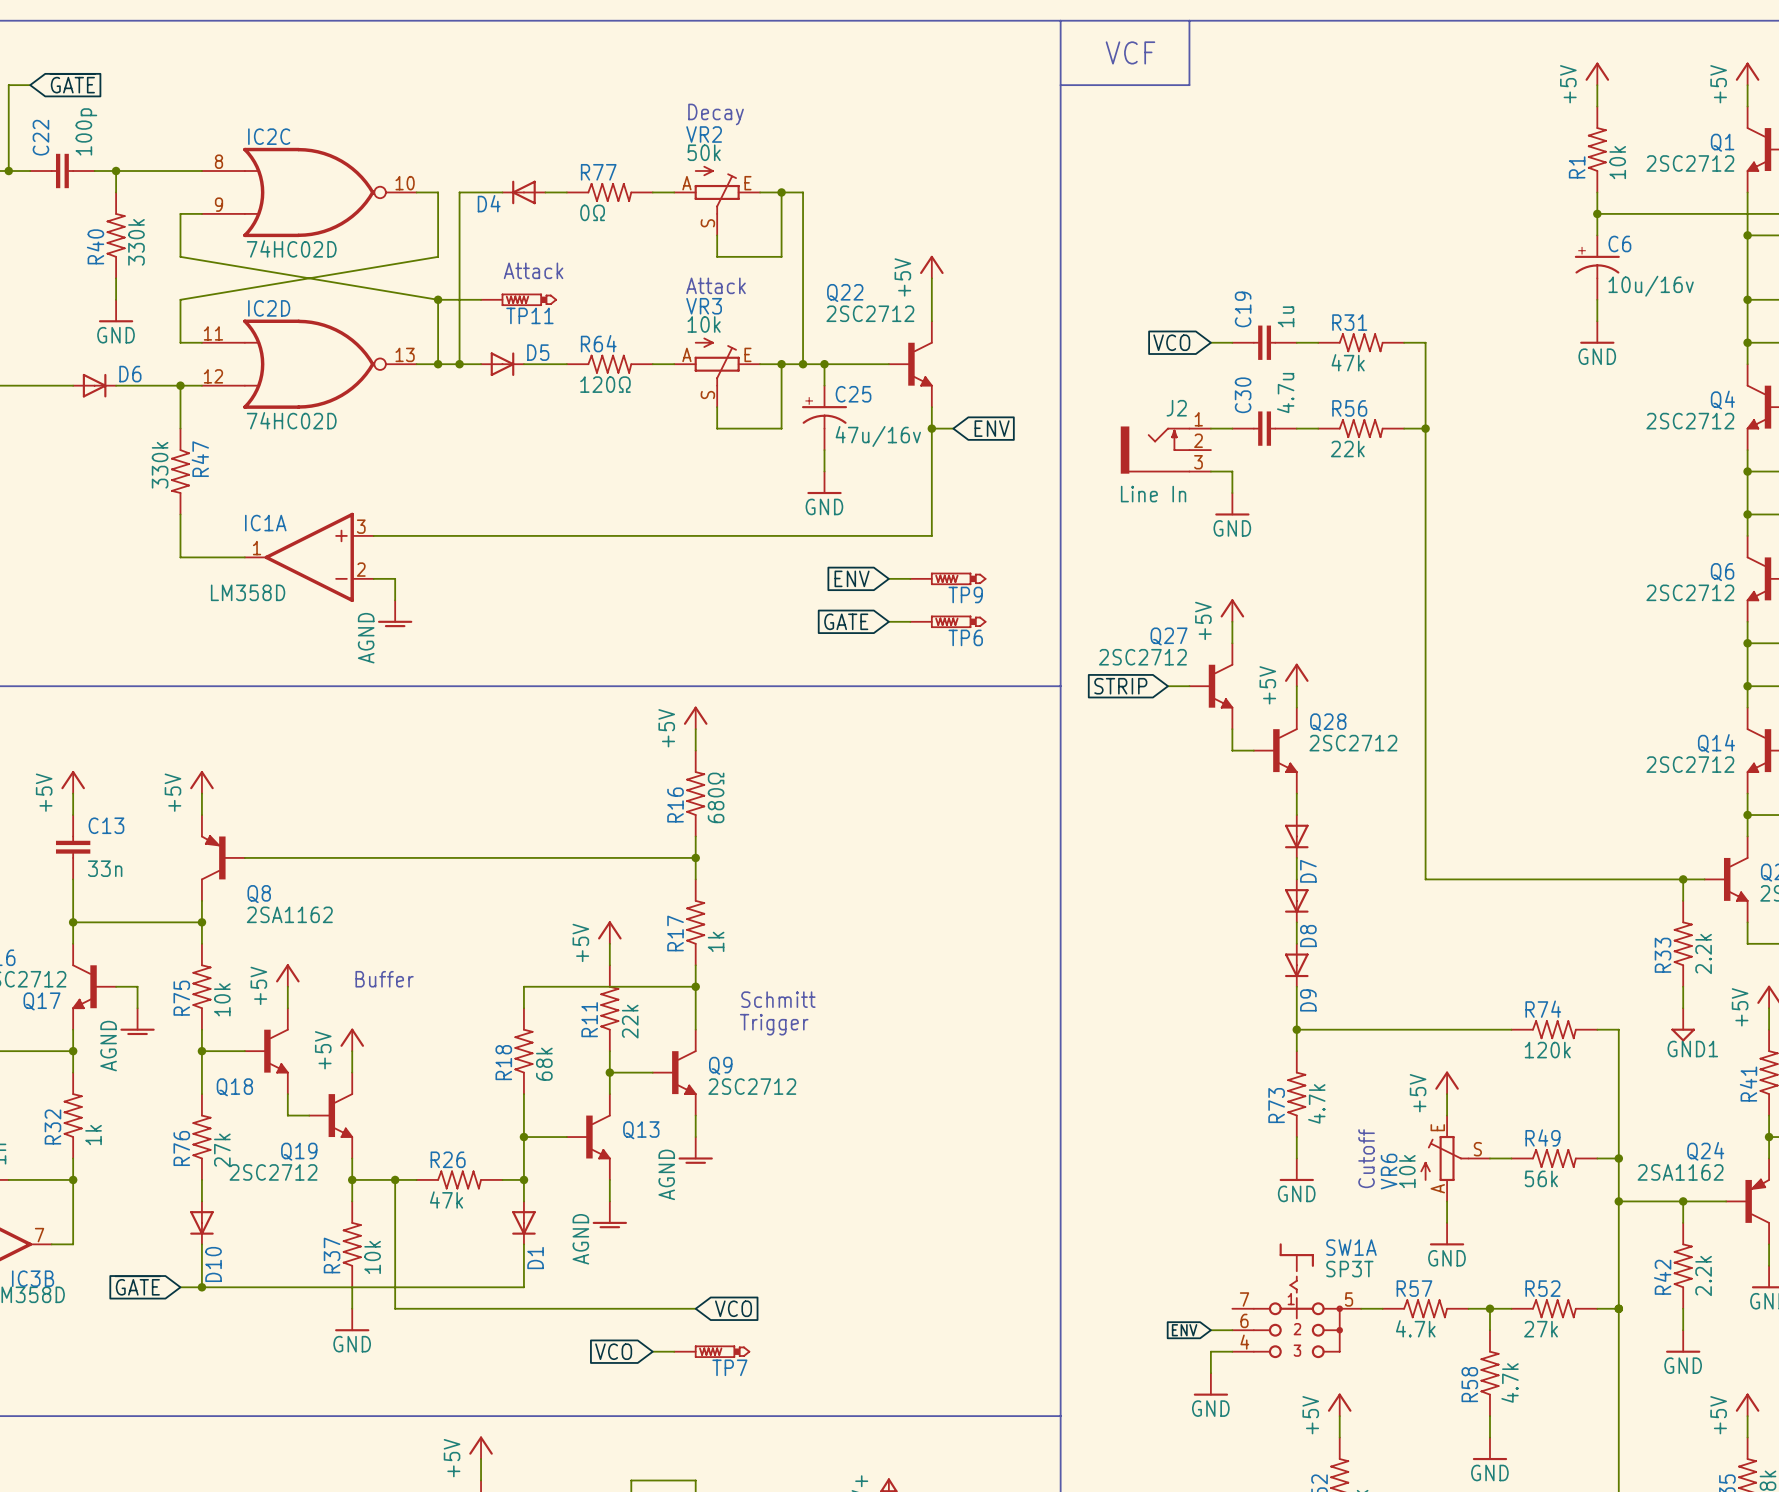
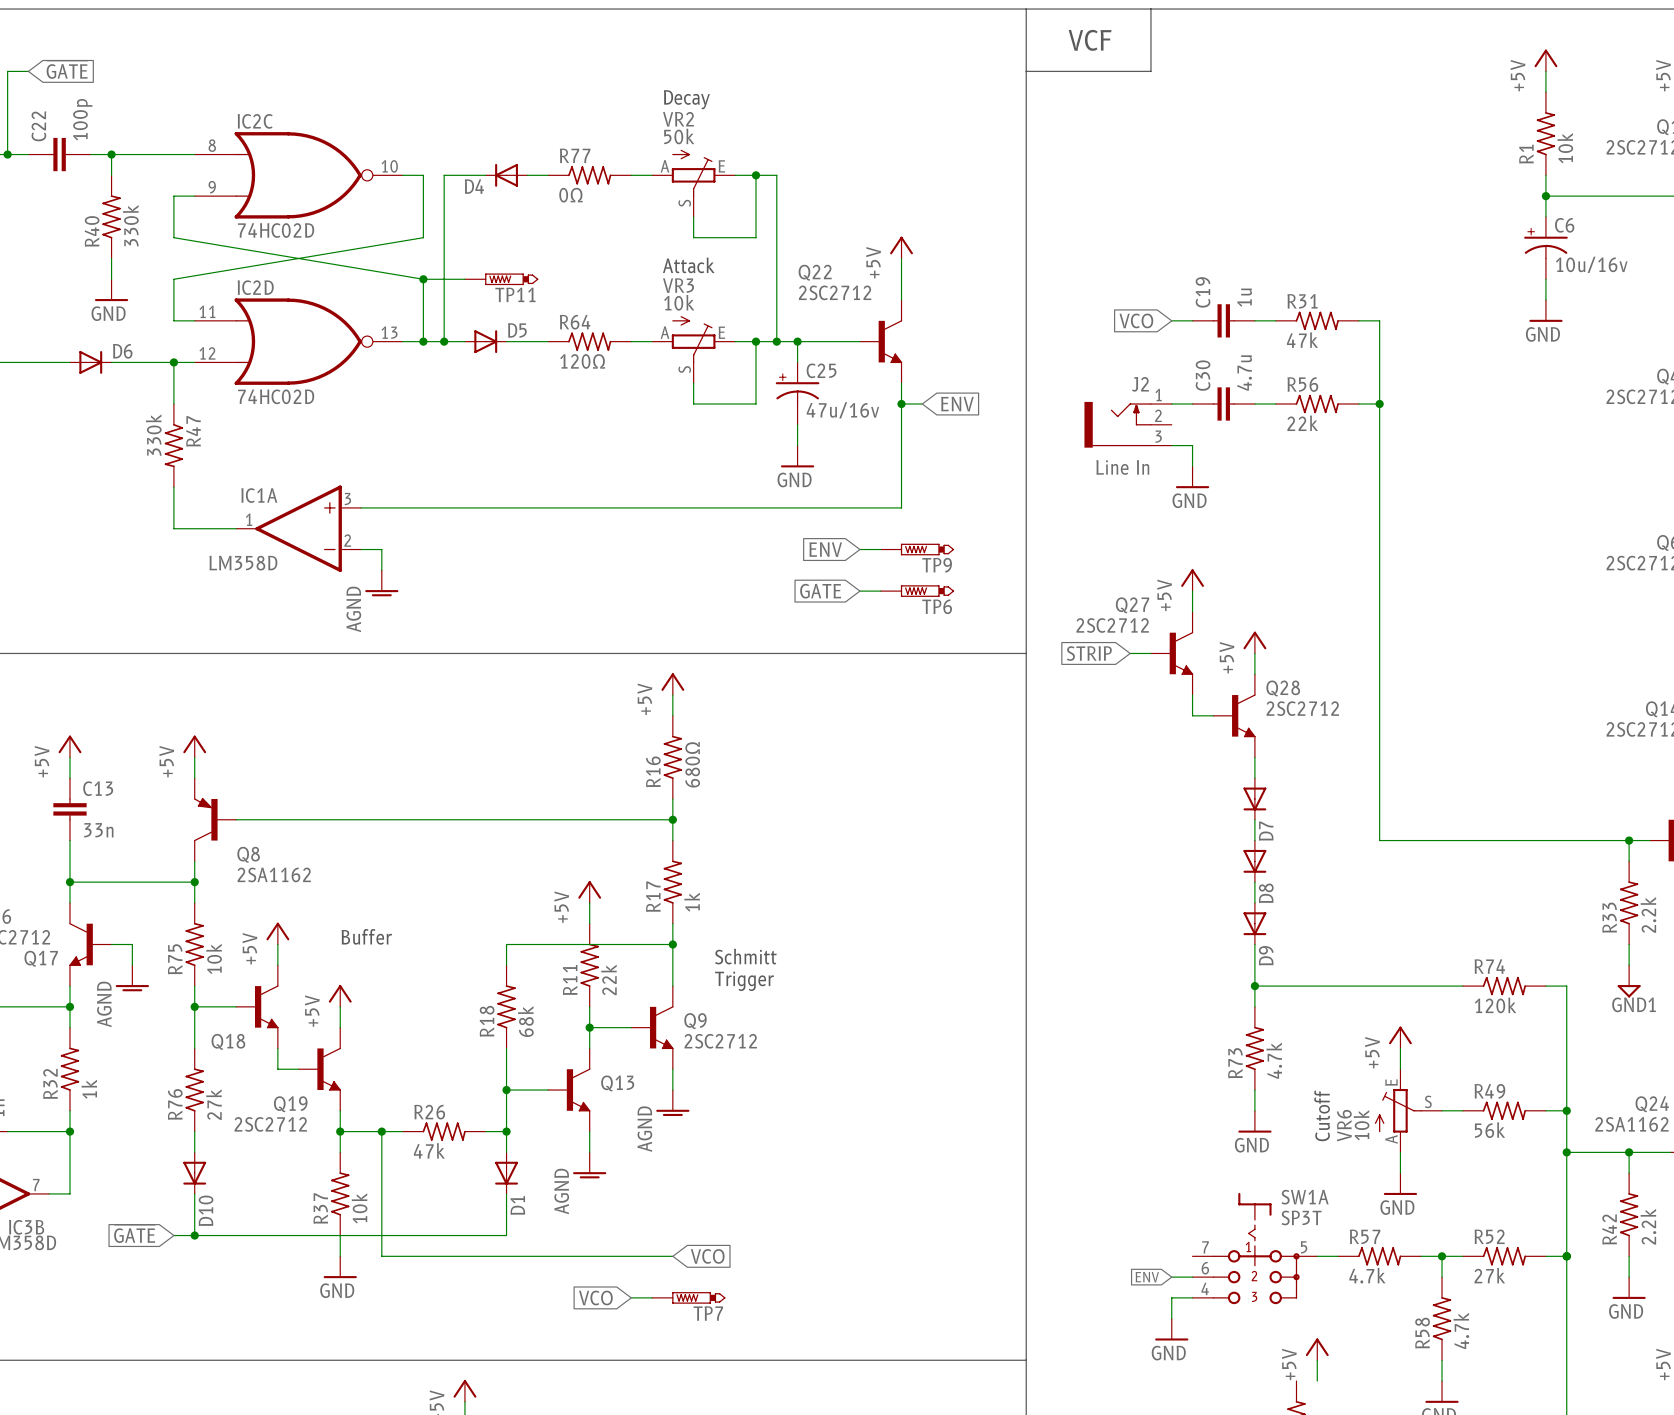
text: Attack (533, 270) -> none
power symbol position: +5V (1339, 1404) -> +5V (1317, 1349)
wire: (1339, 1416) (1339, 1437) -> (1317, 1360) (1317, 1381)

